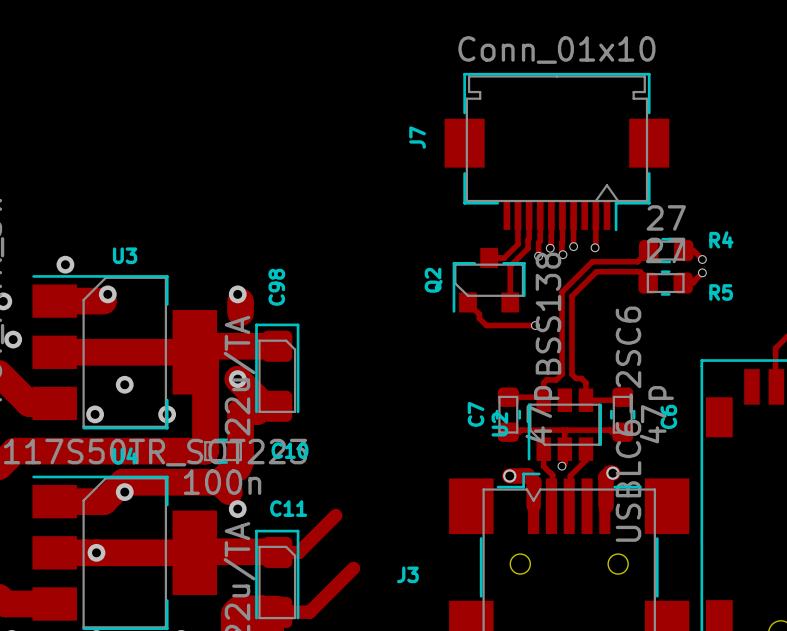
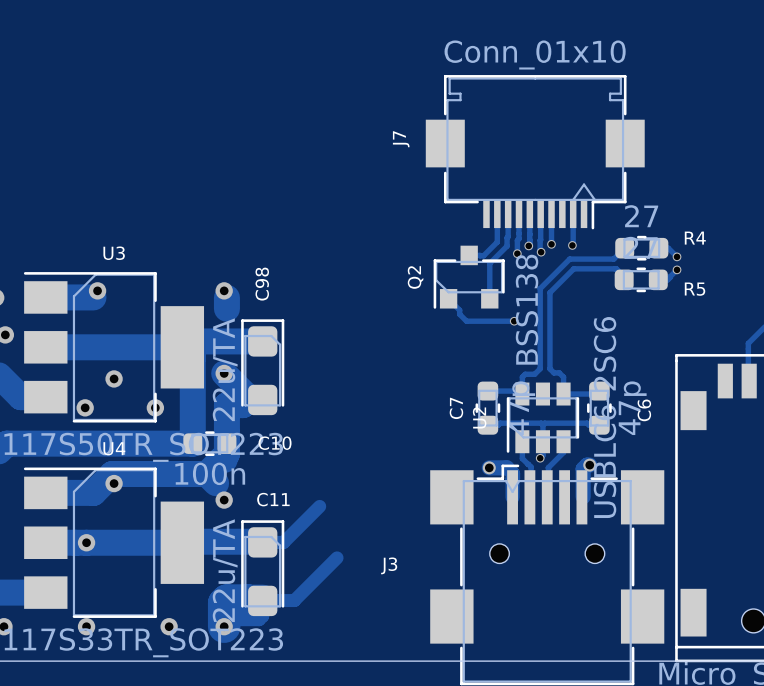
via: (65, 264) -> none

